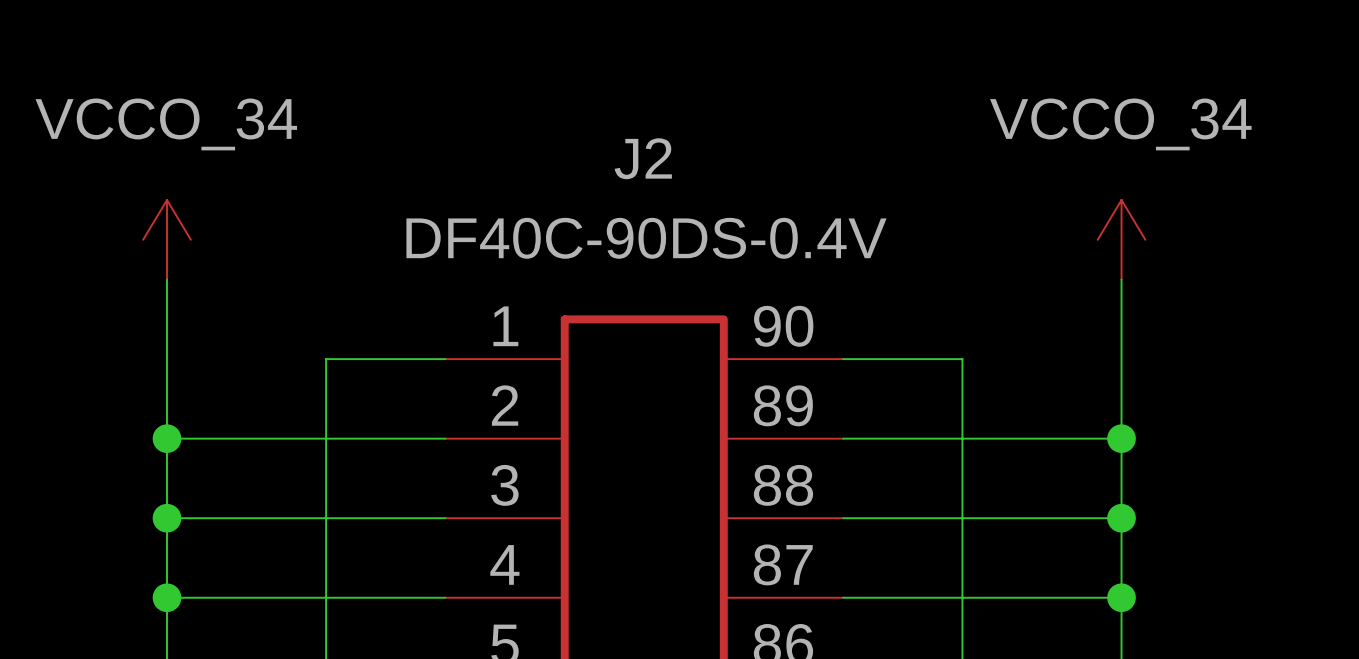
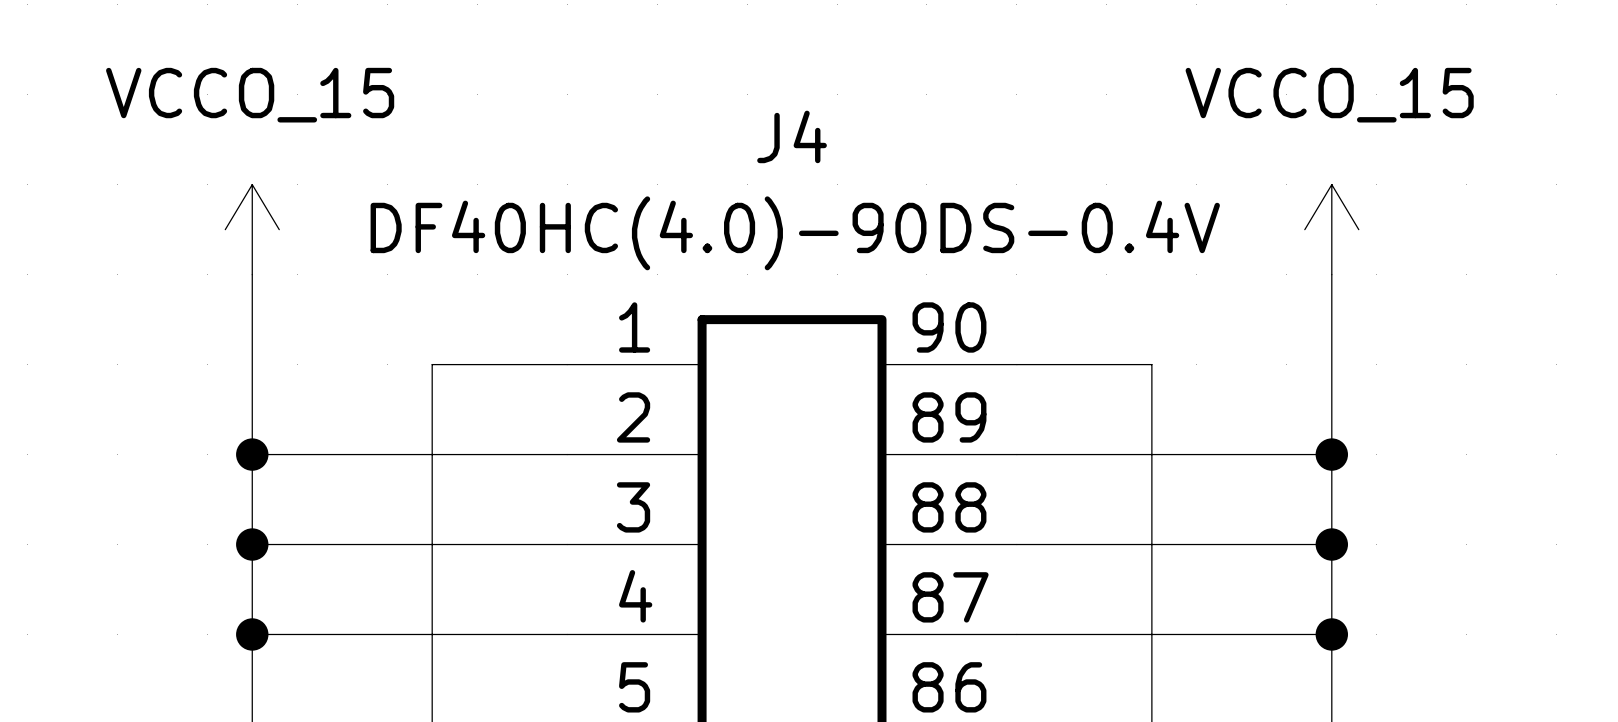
J2 name: J2 (643, 158) -> J4 (792, 136)
J2 value: DF40C-90DS-0.4V (646, 238) -> DF40HC(4.0)-90DS-0.4V (795, 233)
power symbol: VCCO_34 (167, 239) -> VCCO_15 (252, 229)
power symbol: VCCO_34 (1121, 239) -> VCCO_15 (1331, 229)

